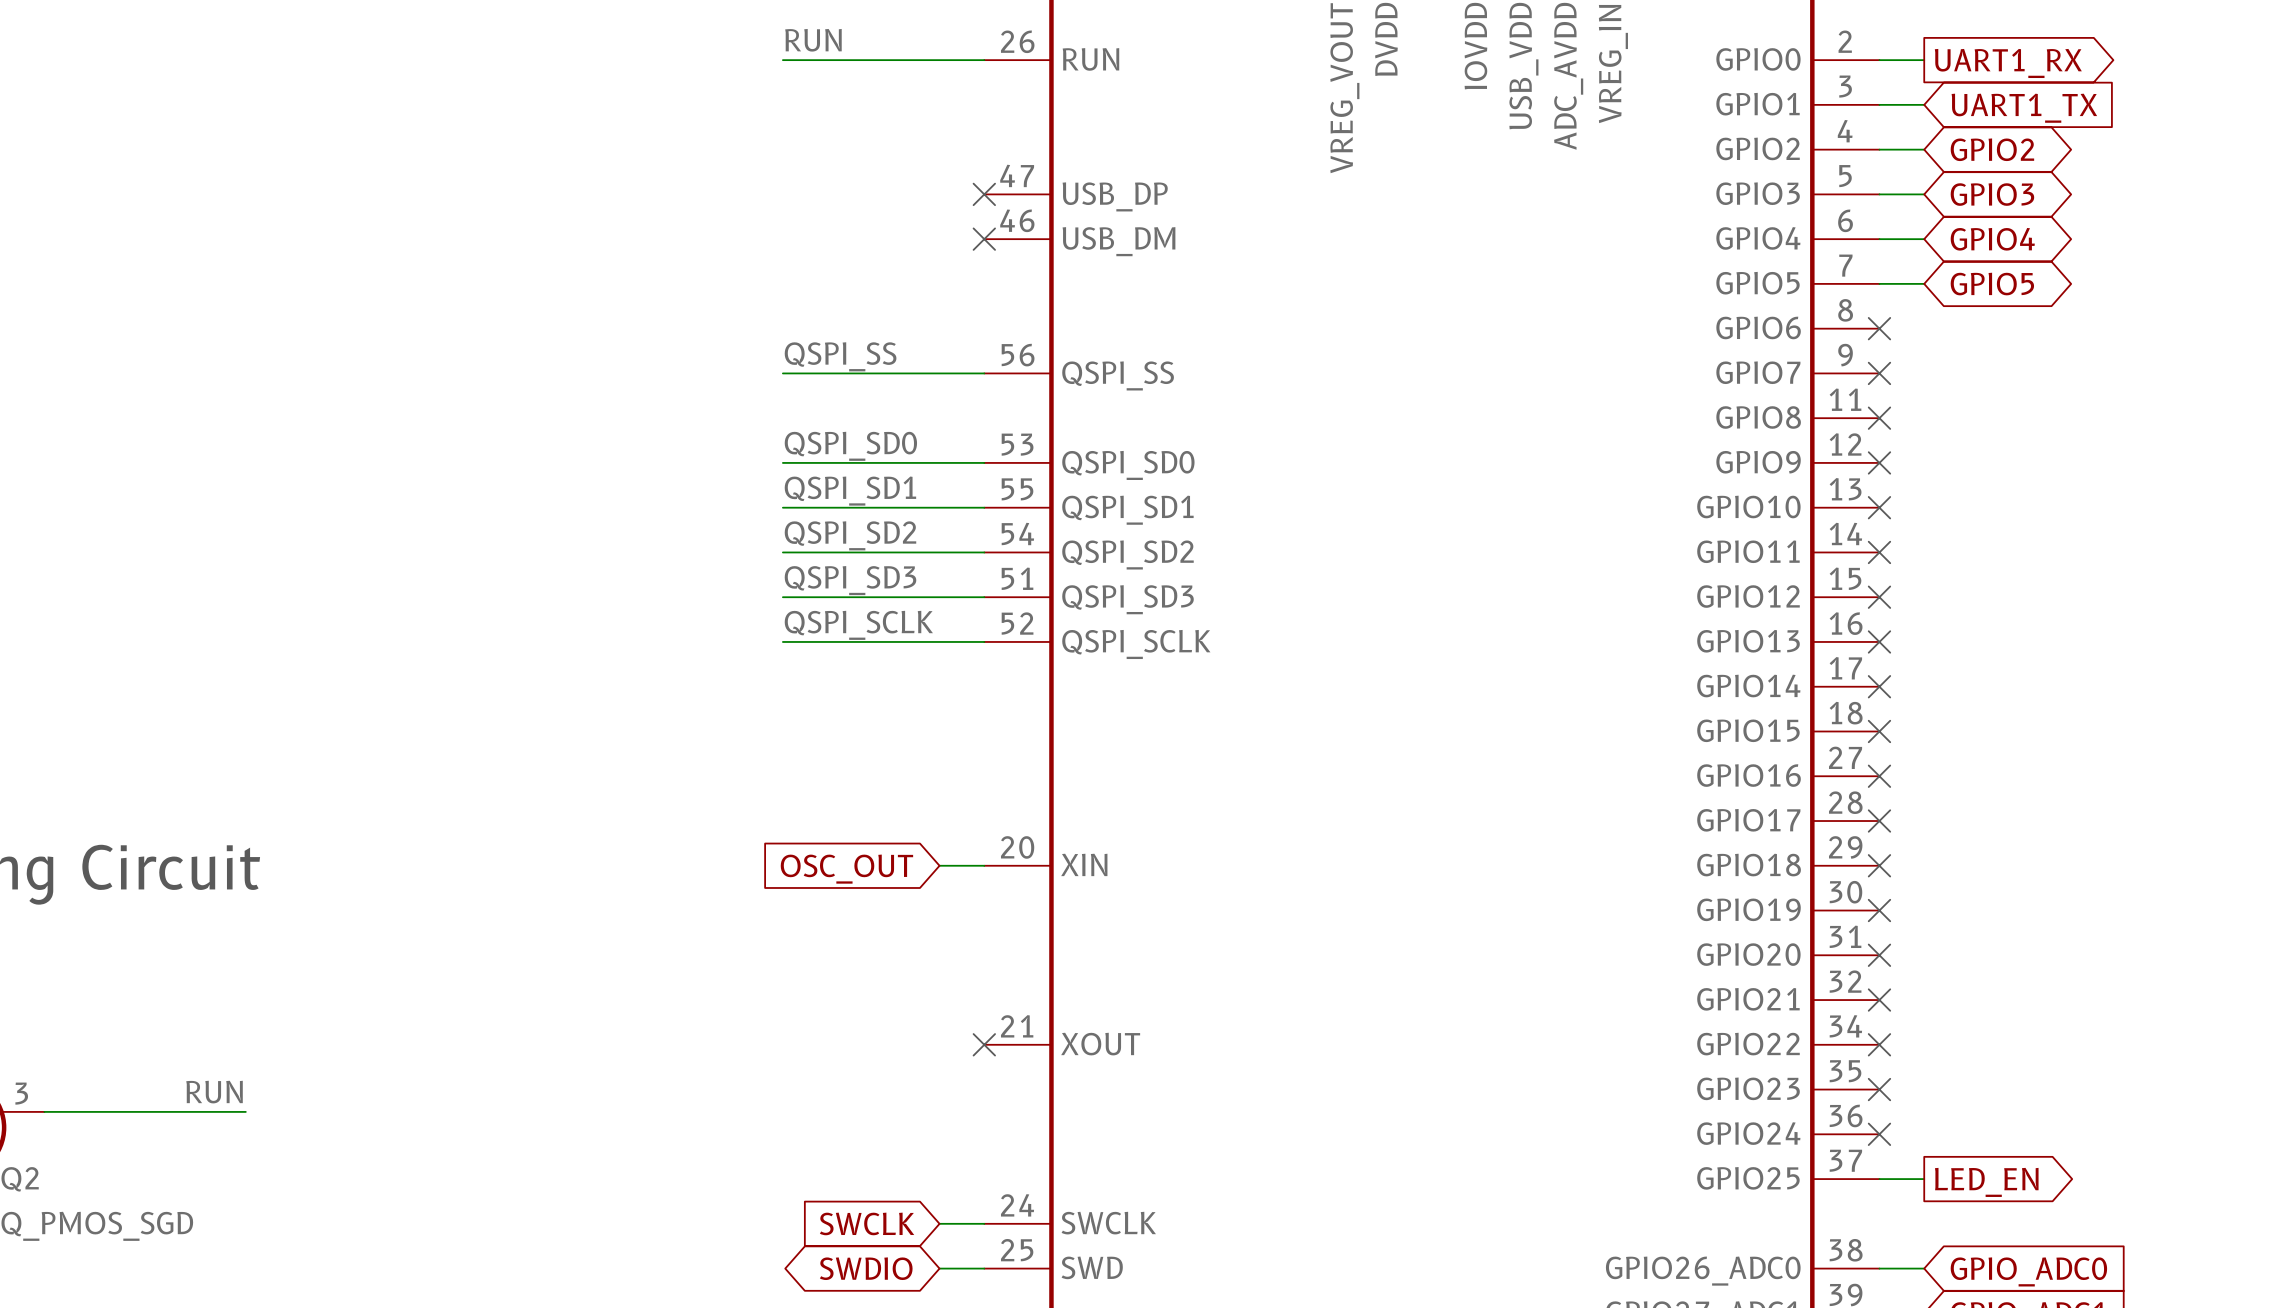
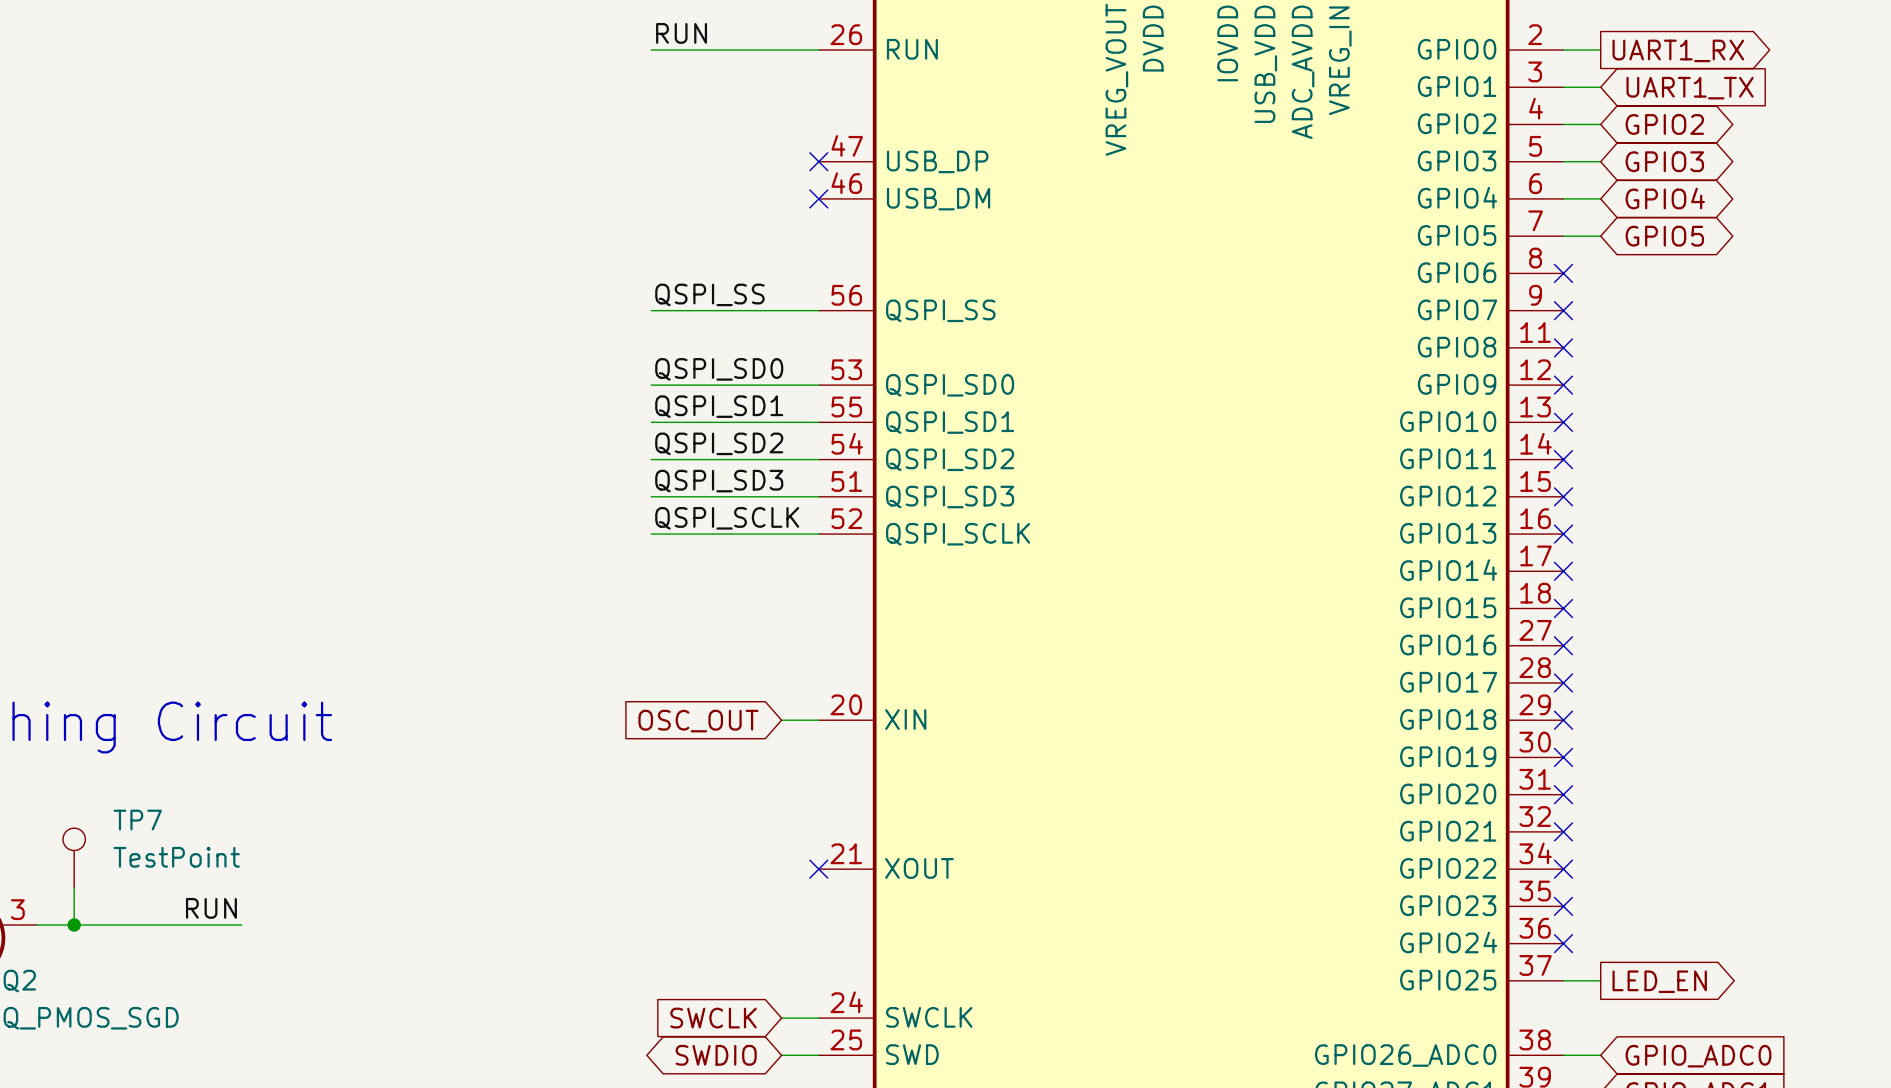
TP7: none -> TestPoint (74, 857)
wire: none -> (74, 887) (74, 924)
label position: RUN (214, 1092) -> RUN (211, 908)
junction: none -> (74, 924)
wire: none -> (204, 924) (241, 924)

